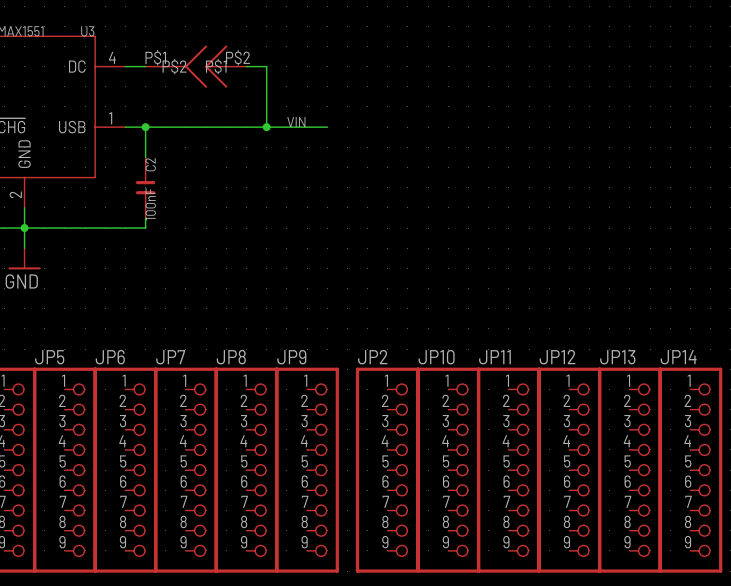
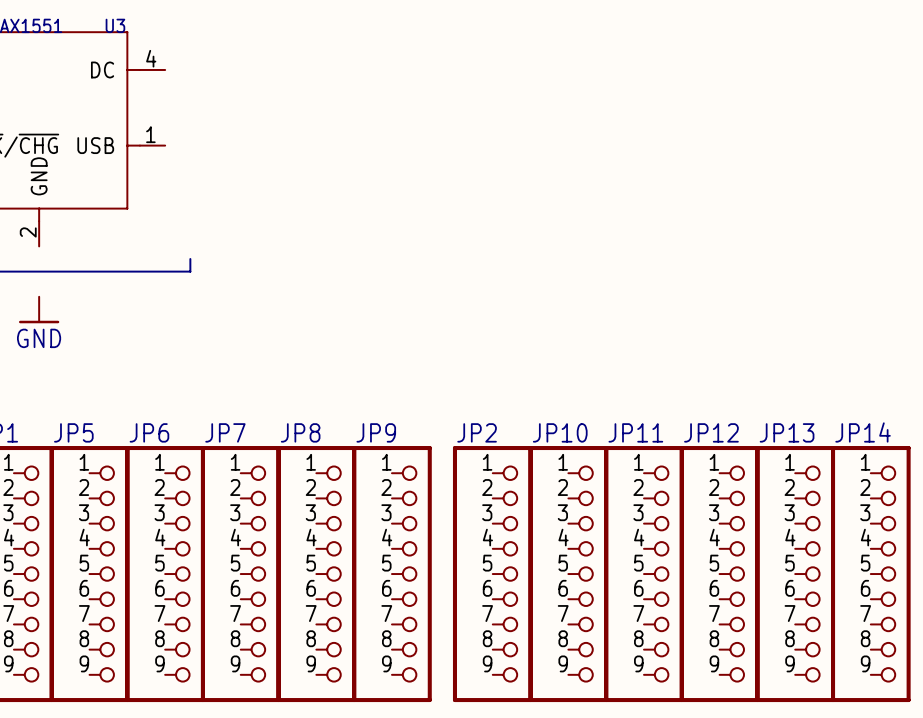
wire: (125, 66) (145, 66) -> none
part: (196, 66) -> none
wire: (246, 66) (266, 66) (266, 127) -> none
label: VIN (296, 122) -> none
wire: (125, 127) (327, 127) -> none
wire: (145, 127) (145, 157) -> none
junction: (145, 127) -> none
junction: (266, 127) -> none
C2: 100nF (145, 187) -> none
wire: (24, 207) (24, 248) -> none
junction: (24, 228) -> none

